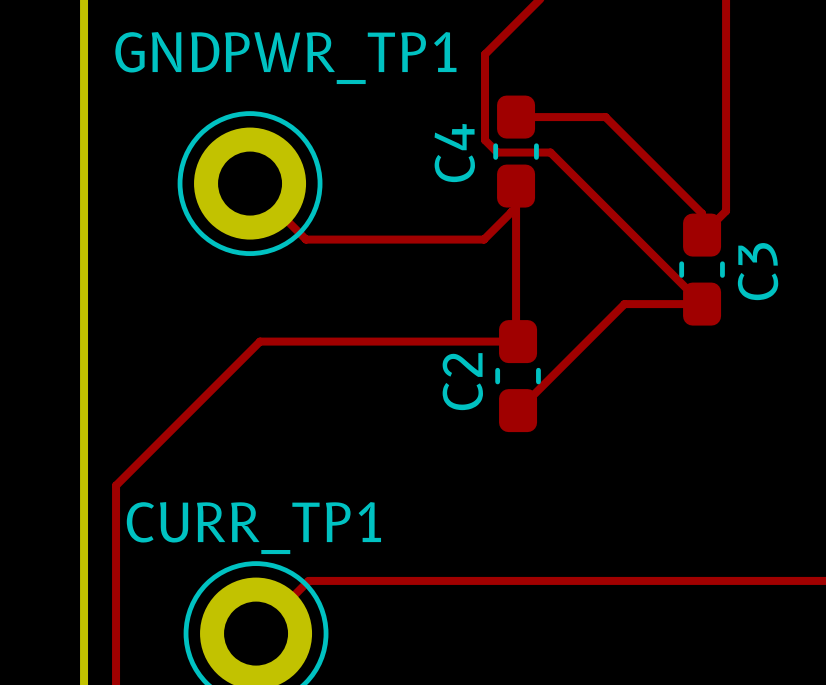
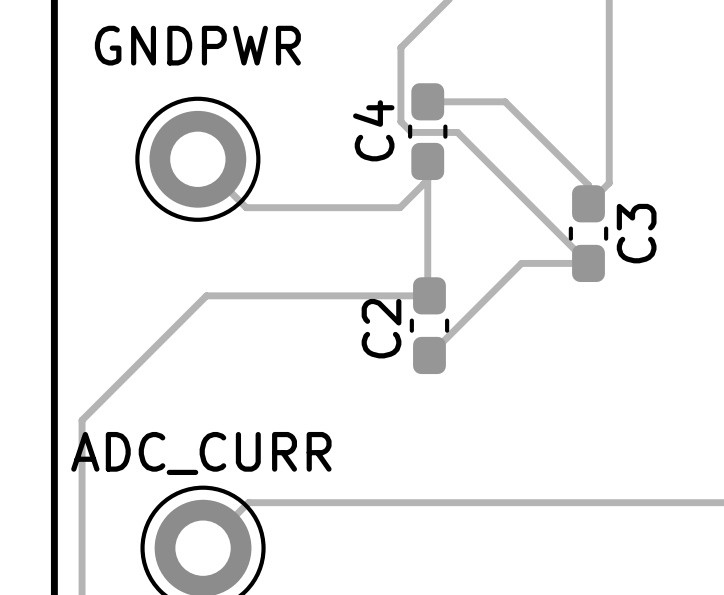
GNDPWR_TP1 name: GNDPWR_TP1 (285, 58) -> GNDPWR (197, 45)
CURR_TP1 name: CURR_TP1 (253, 528) -> ADC_CURR (201, 453)

